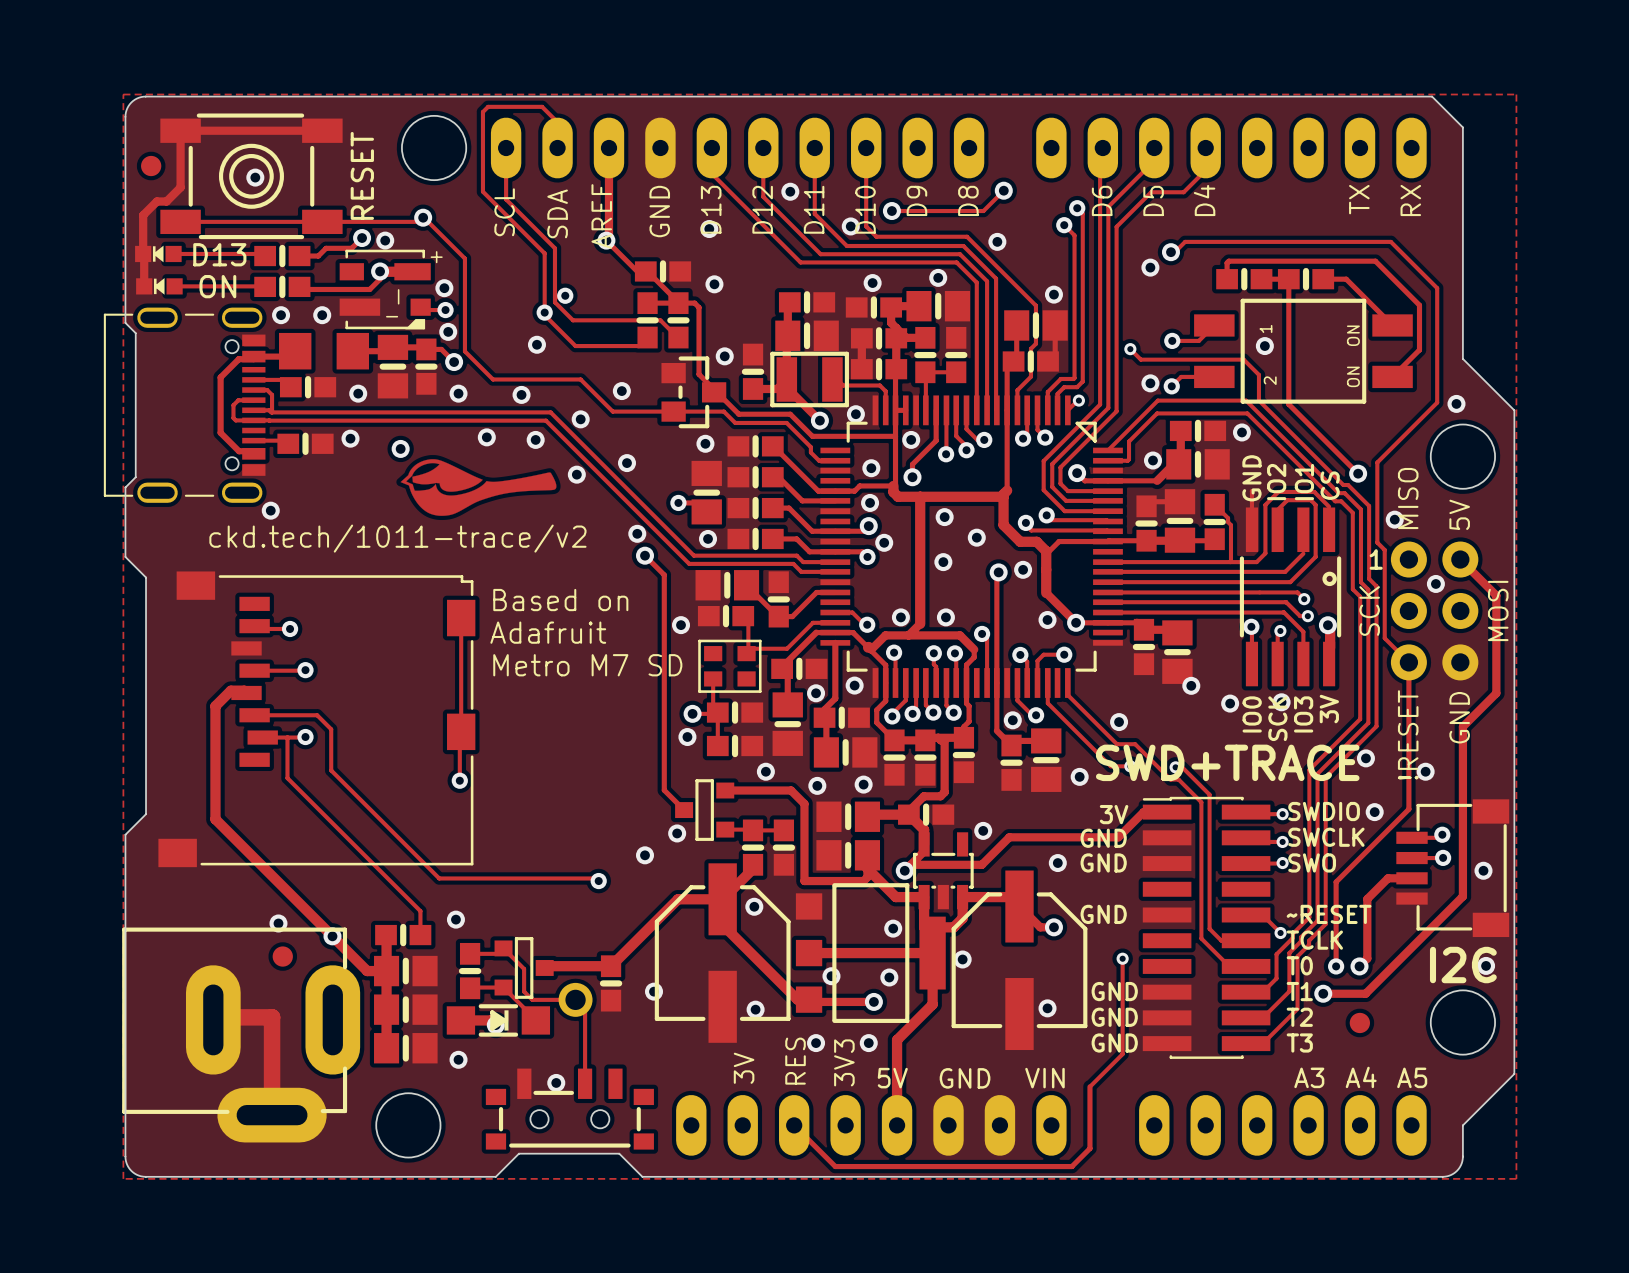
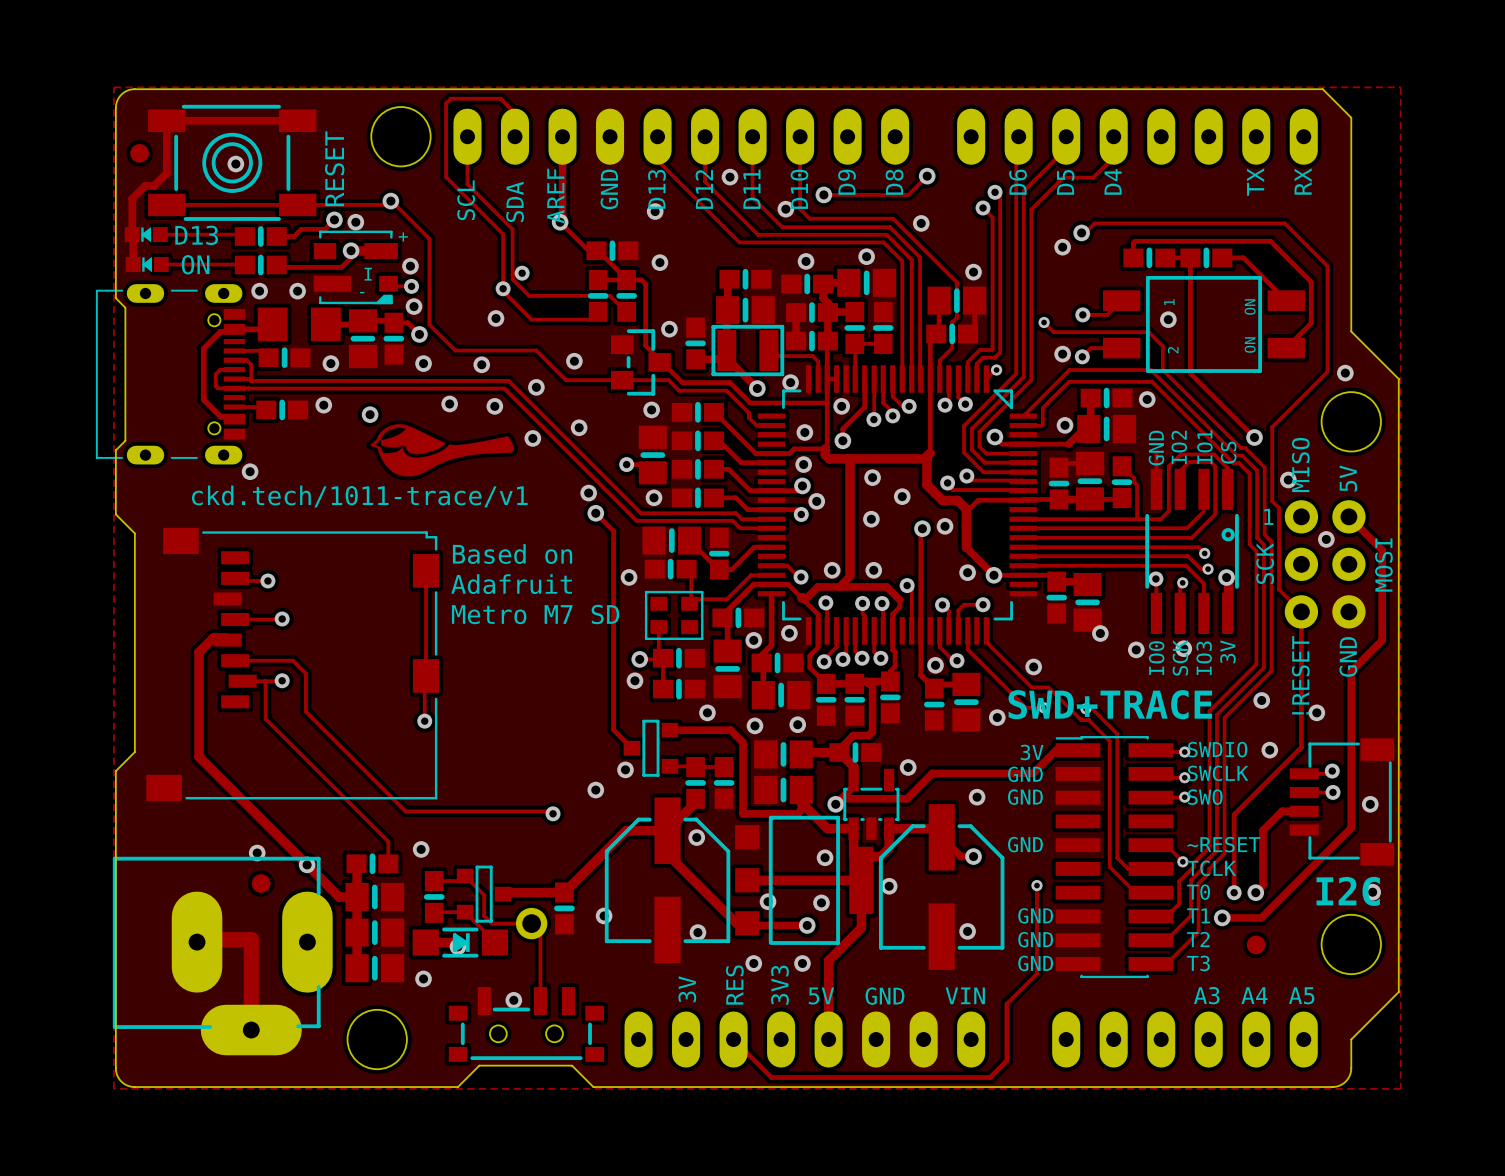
part footprint: [103, 307, 266, 503] -> [95, 284, 246, 465]
text: ckd.tech/1011-trace/v2 (397, 538) -> ckd.tech/1011-trace/v1 (359, 496)
part footprint: [122, 927, 361, 1143] -> [112, 856, 333, 1056]

